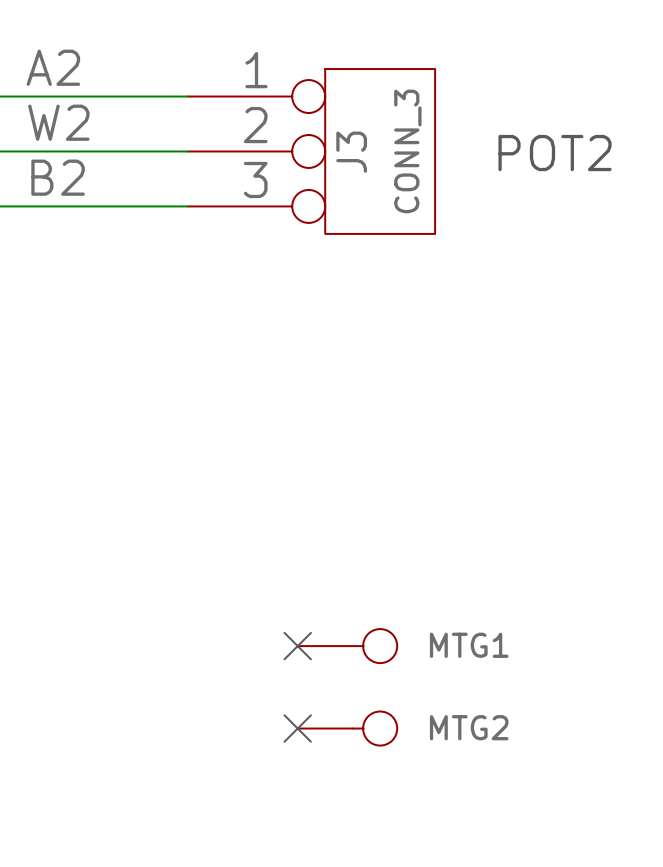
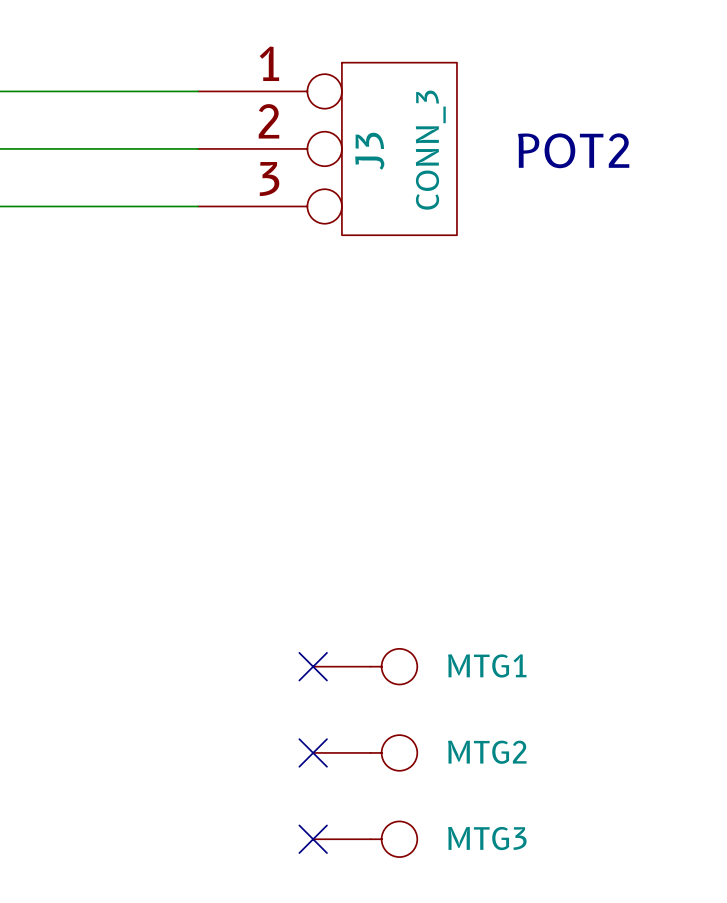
label: A2 (53, 67) -> none
label: W2 (58, 122) -> none
label: B2 (58, 177) -> none
no-connect mark: none -> (313, 839)
MTG3: none -> (365, 839)

